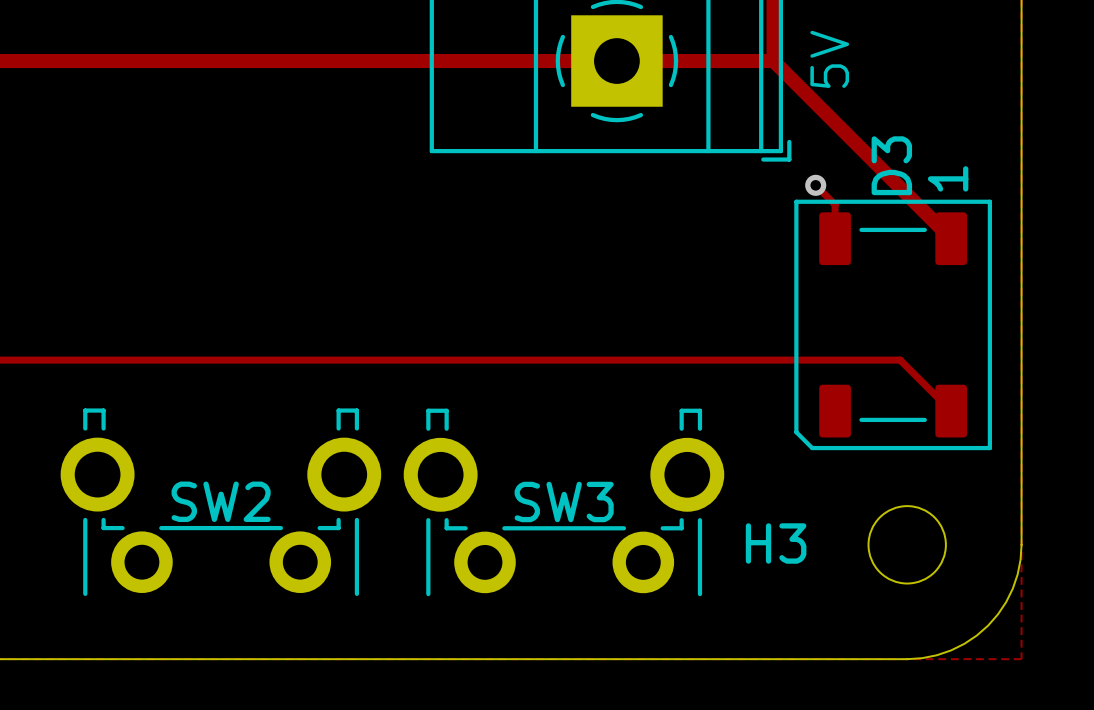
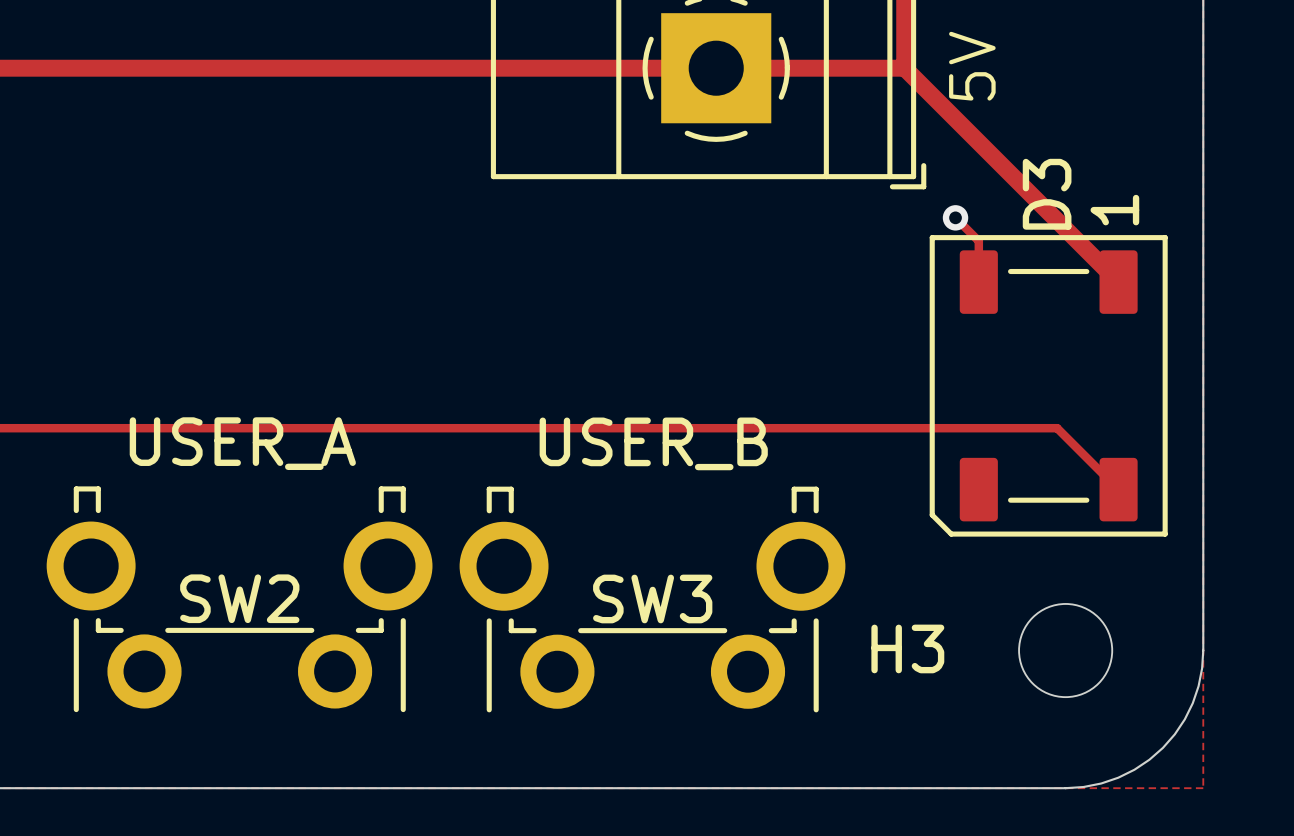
SW2 value: none -> USER_A (242, 443)
SW3 value: none -> USER_B (653, 443)

